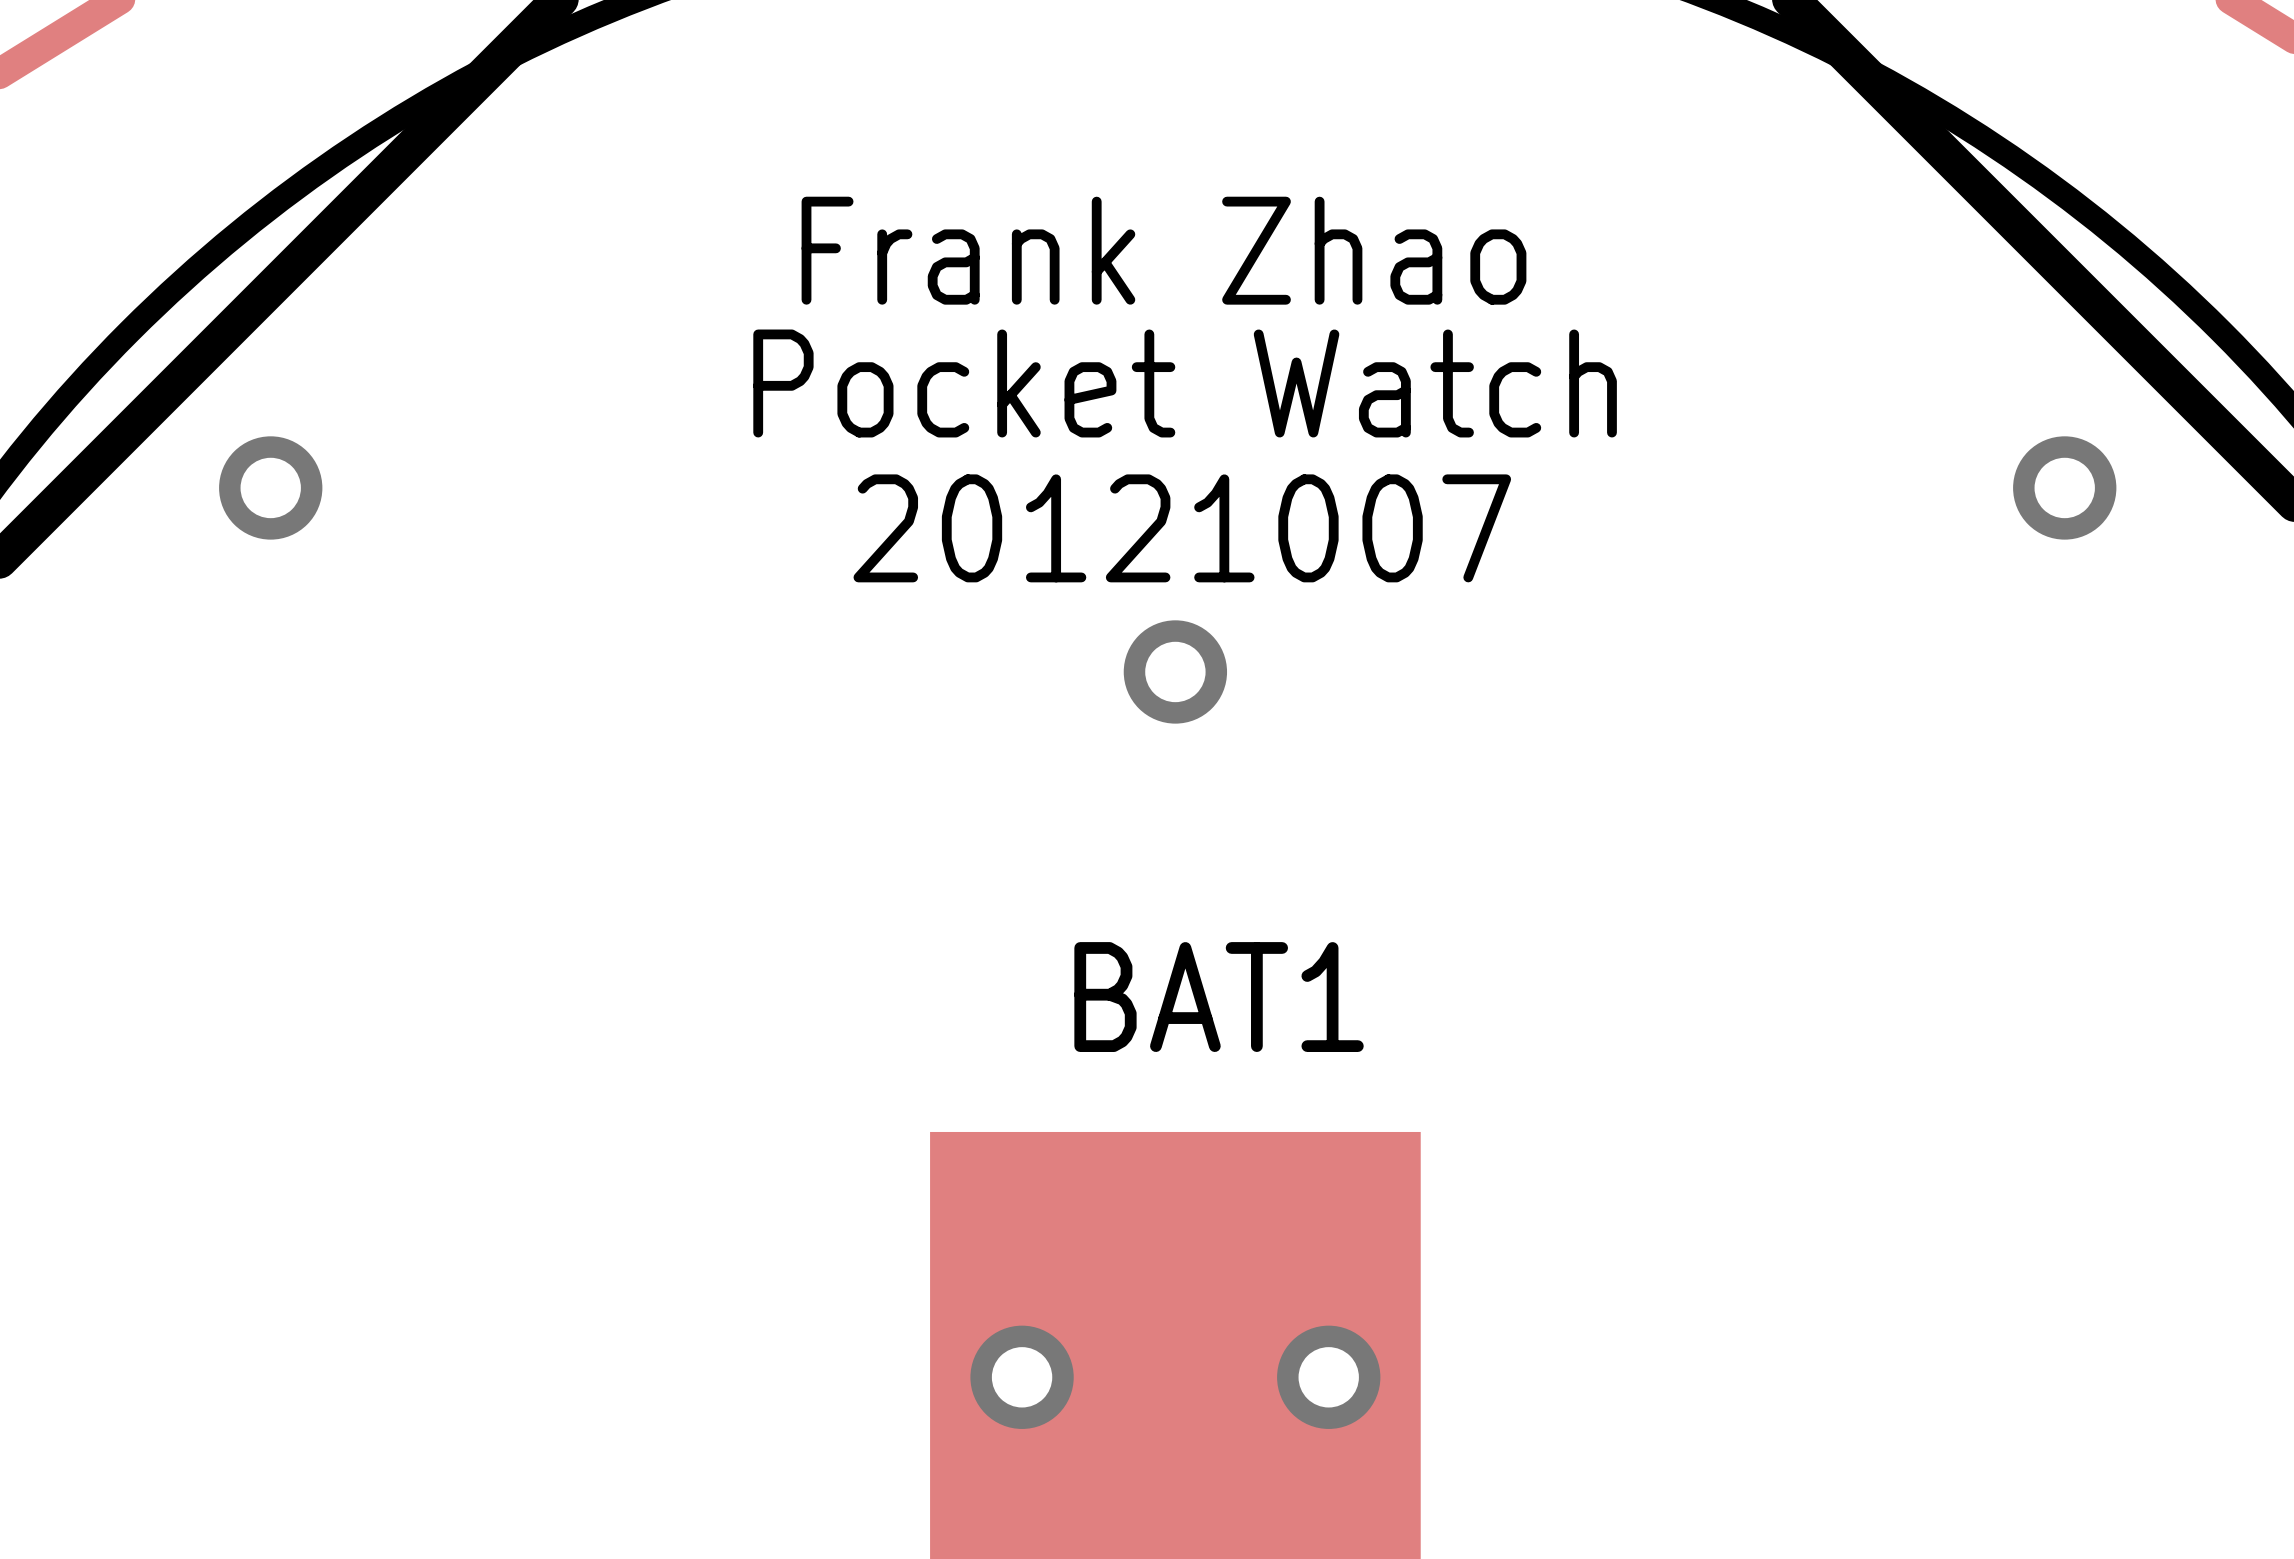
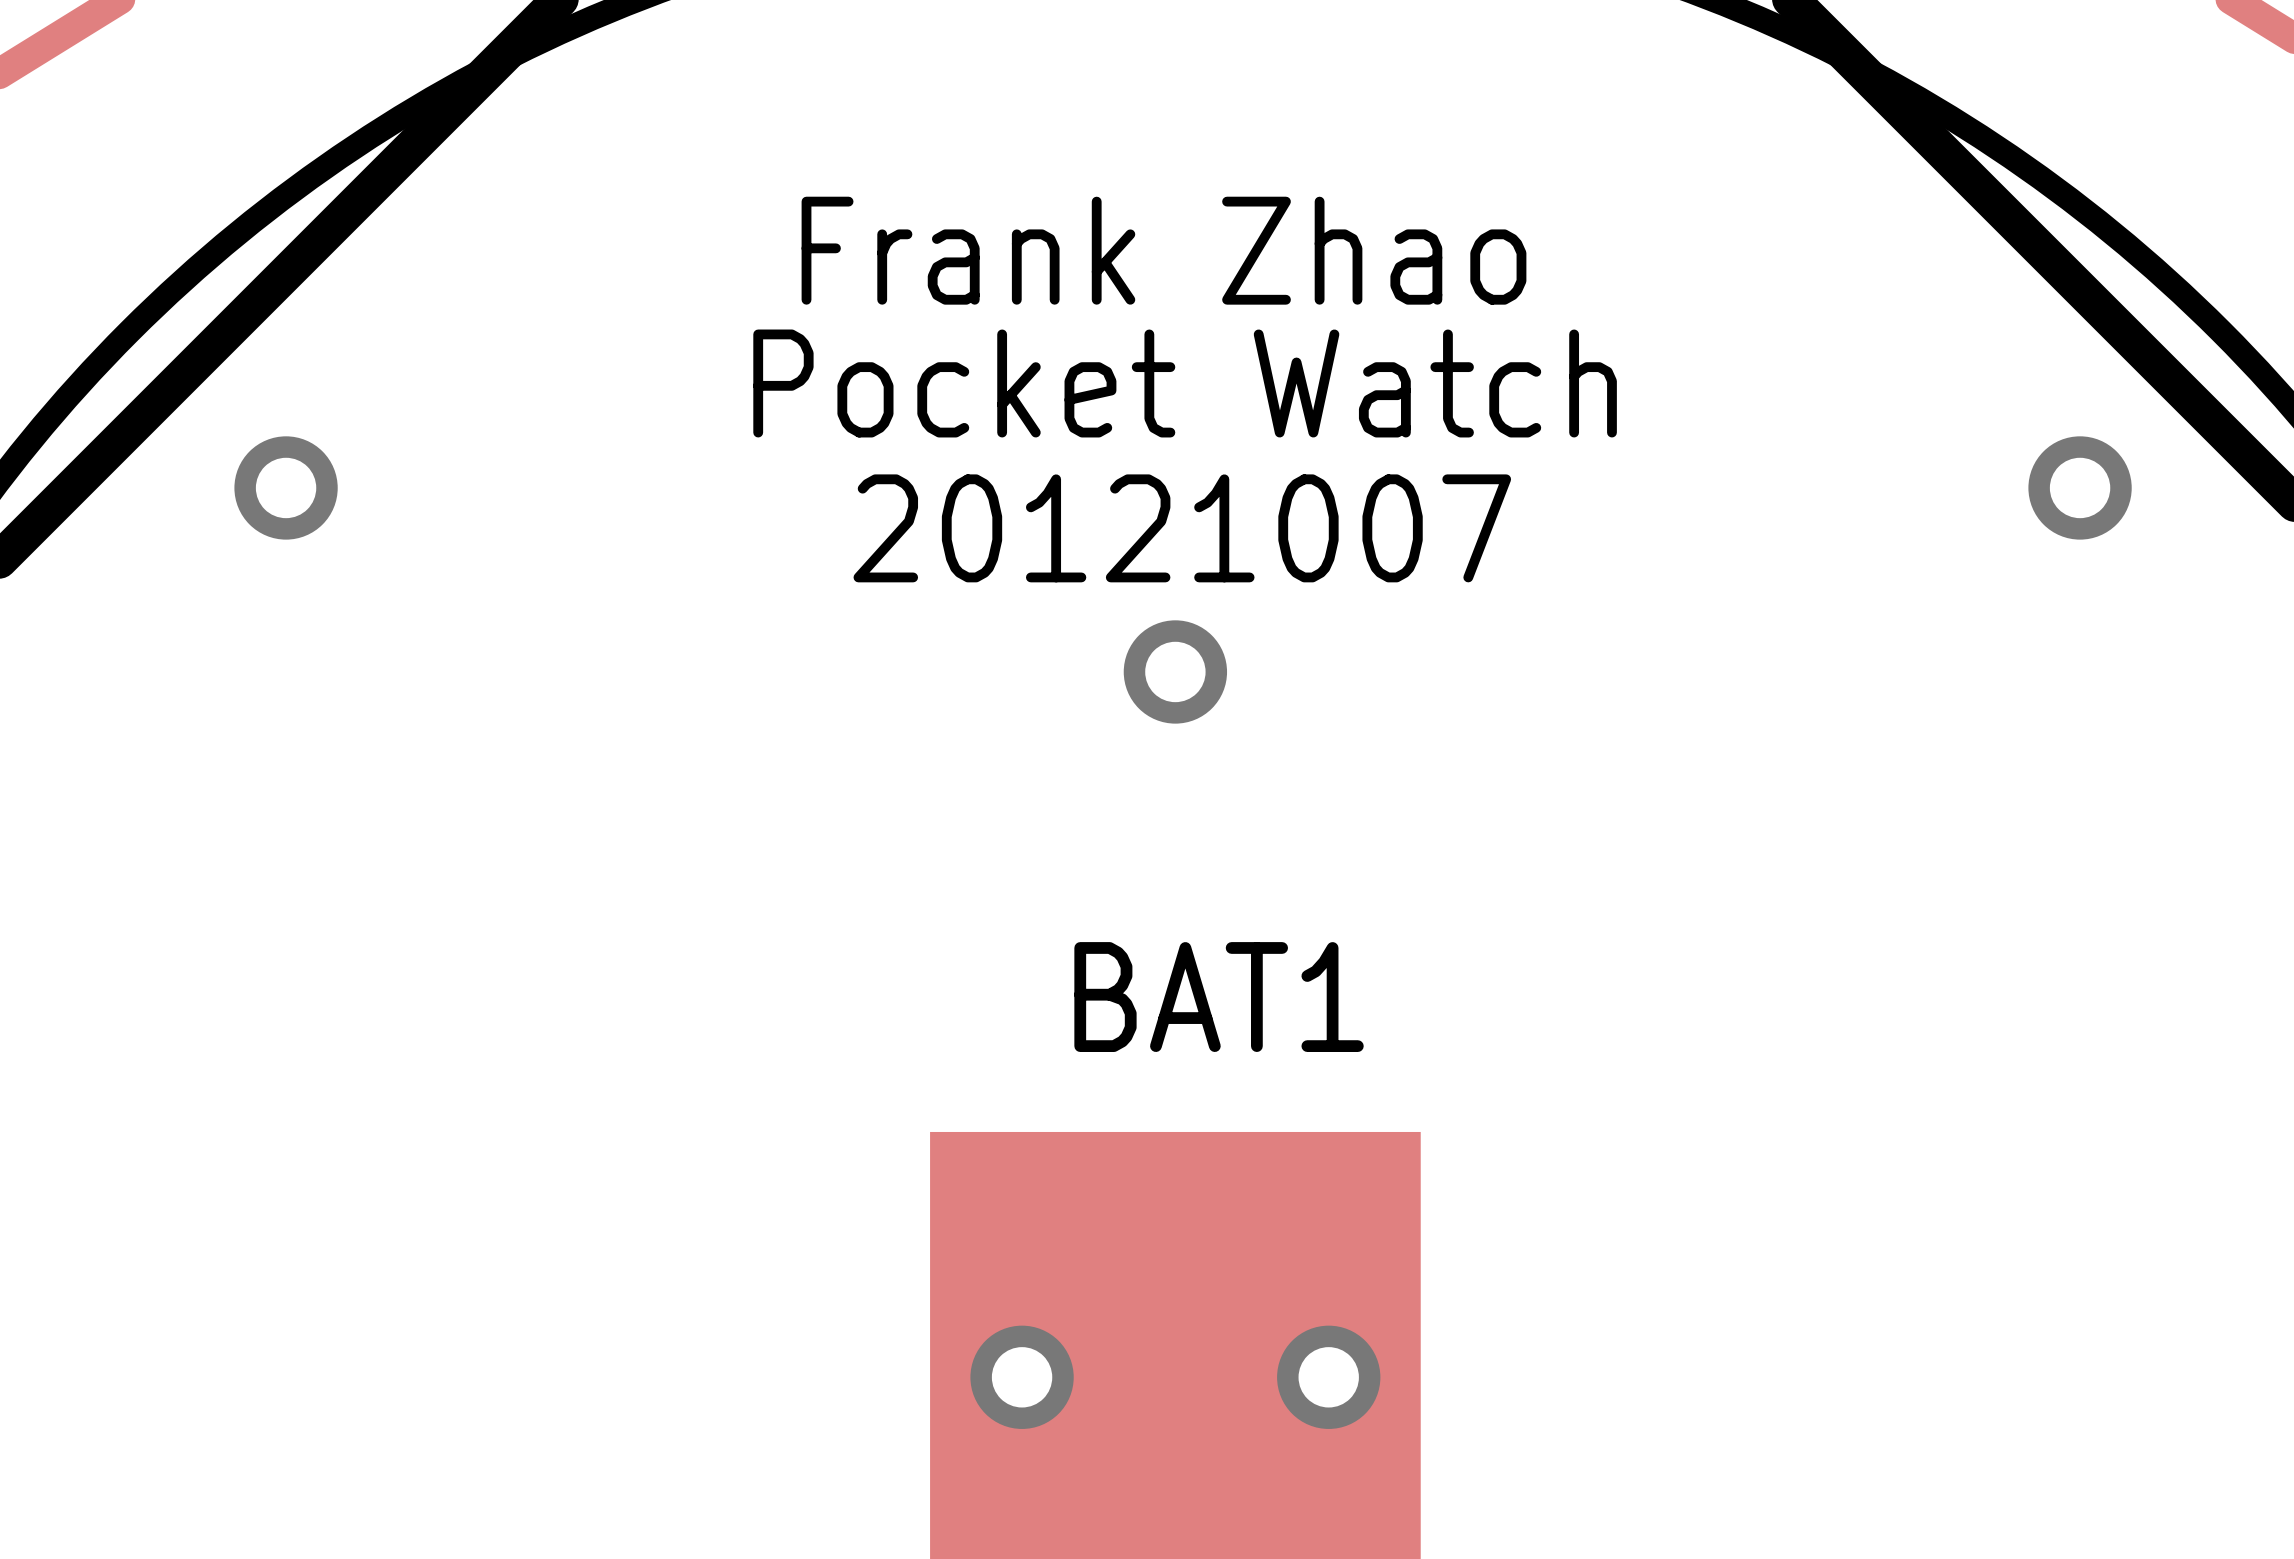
via position: (270, 487) -> (286, 487)
via position: (2064, 487) -> (2080, 487)

